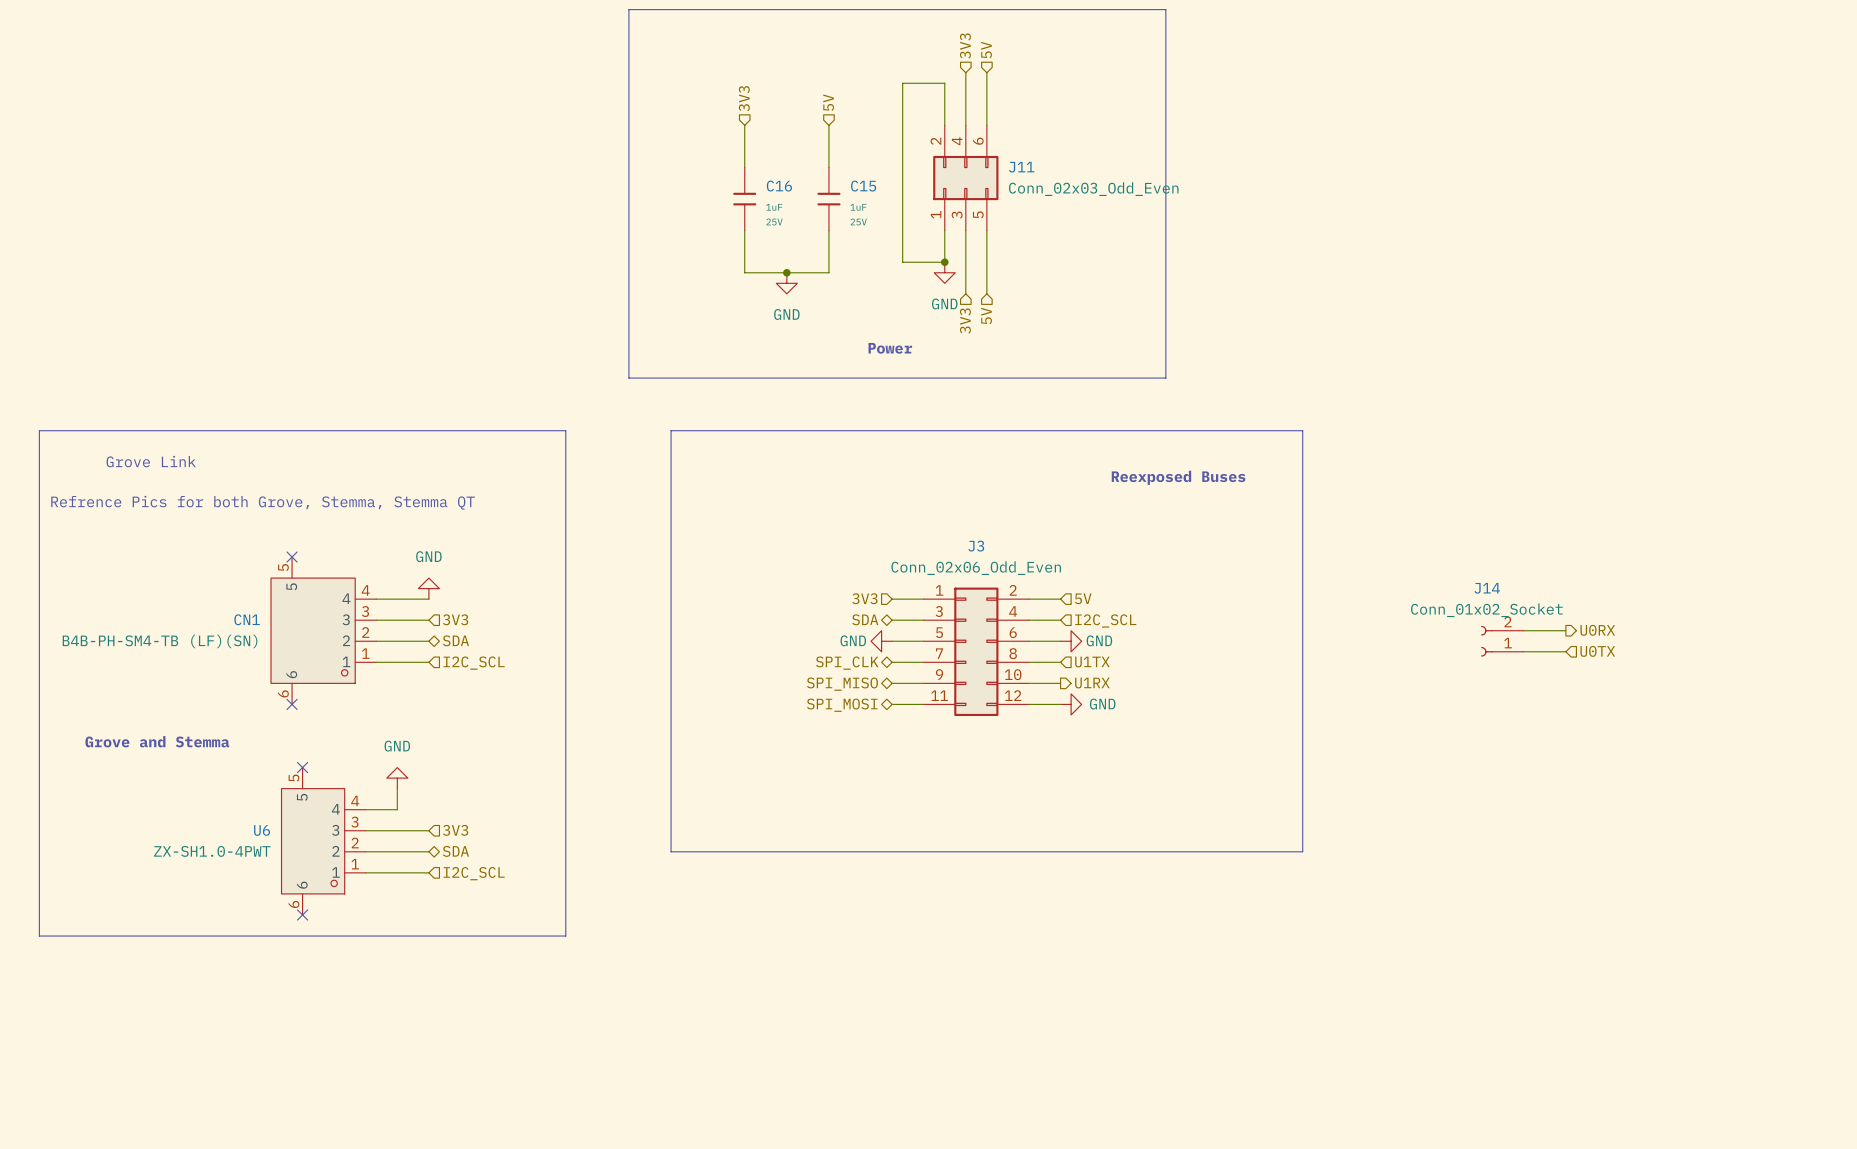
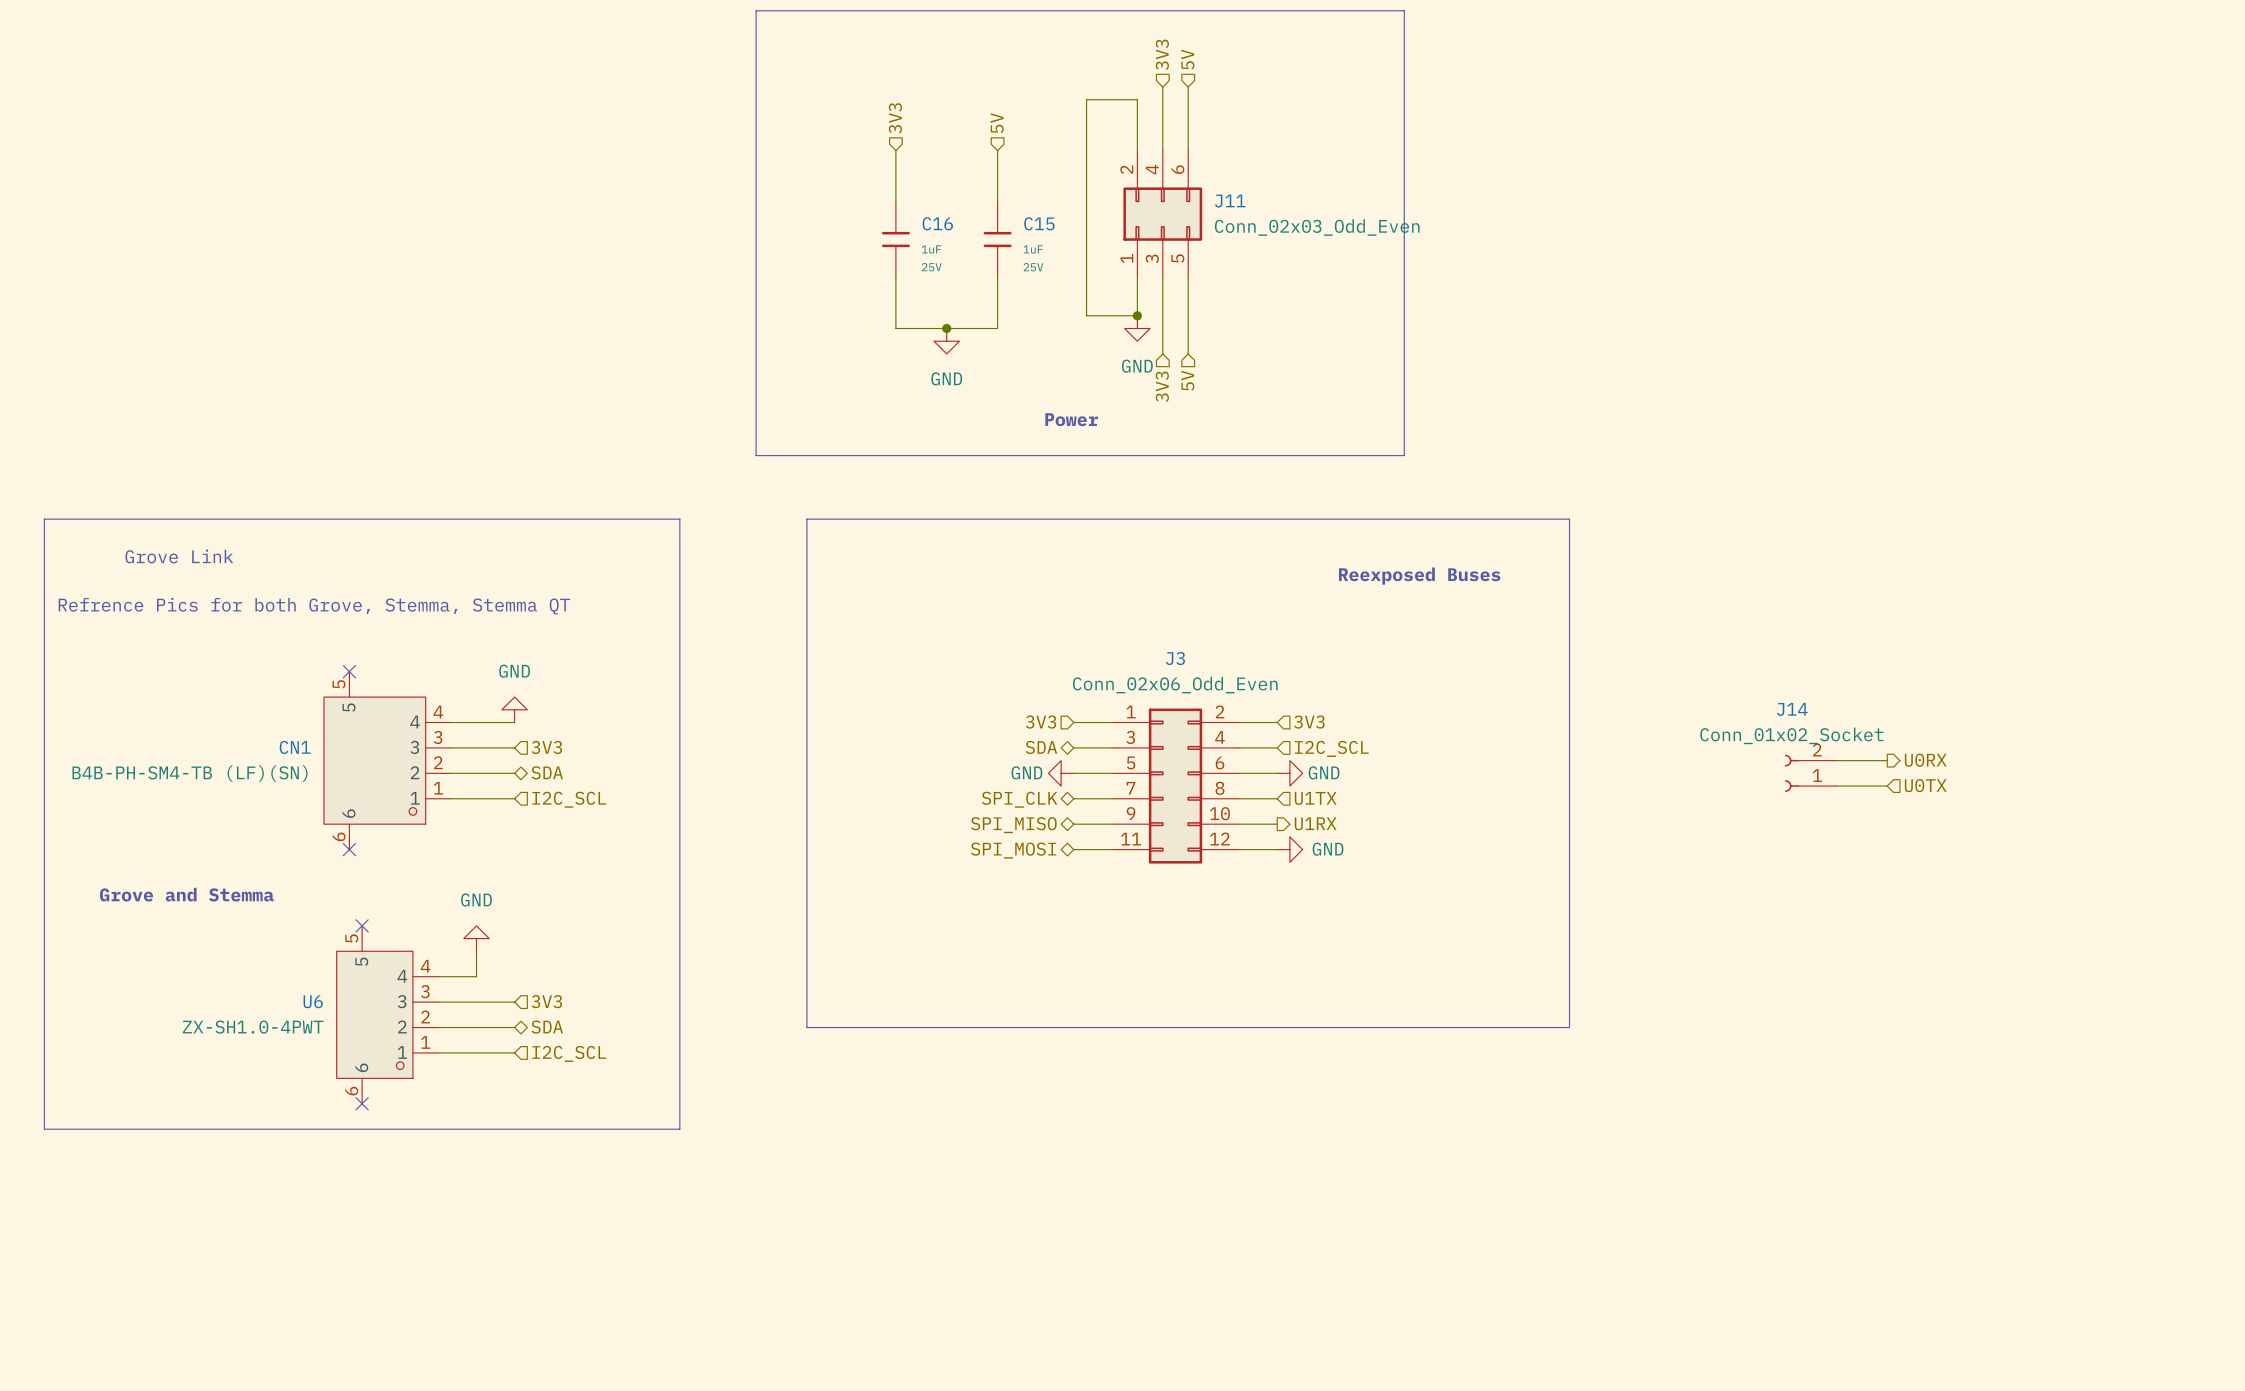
hierarchical label: 5V (1083, 598) -> 3V3 (1309, 722)

